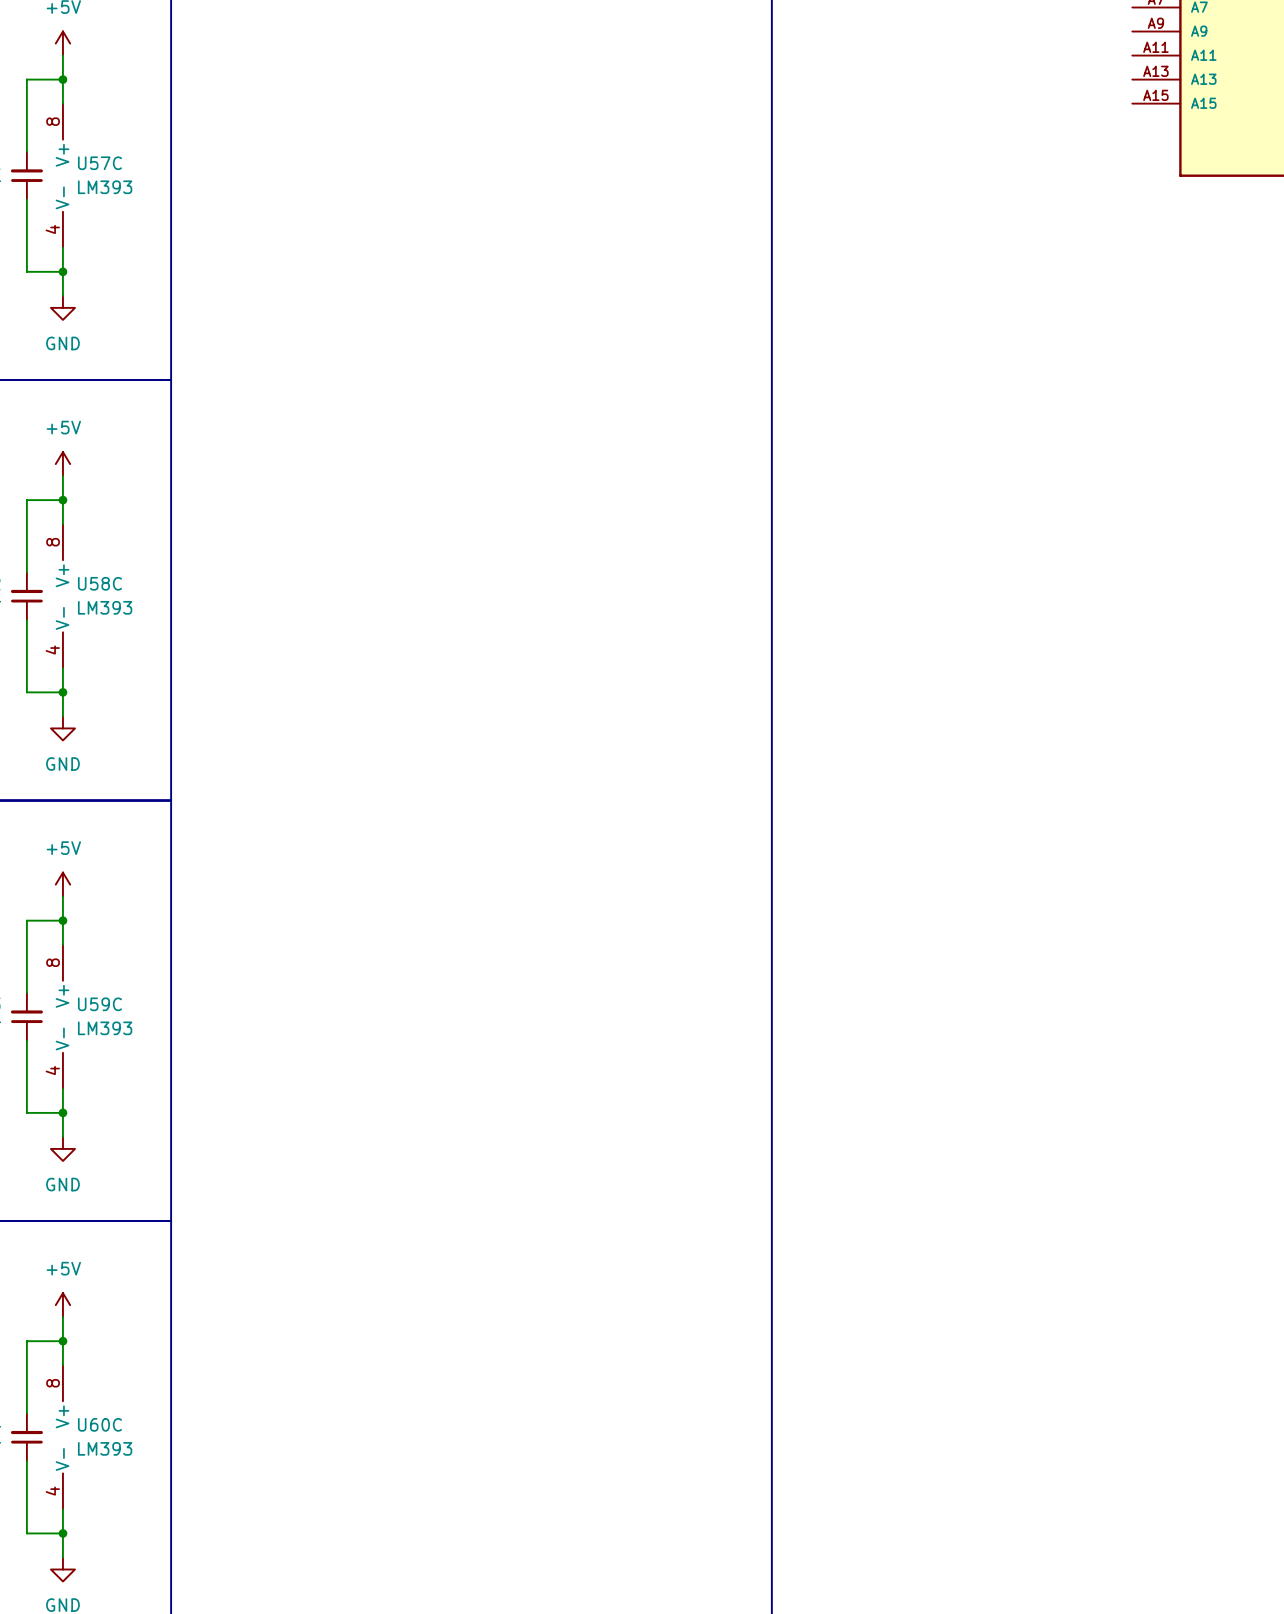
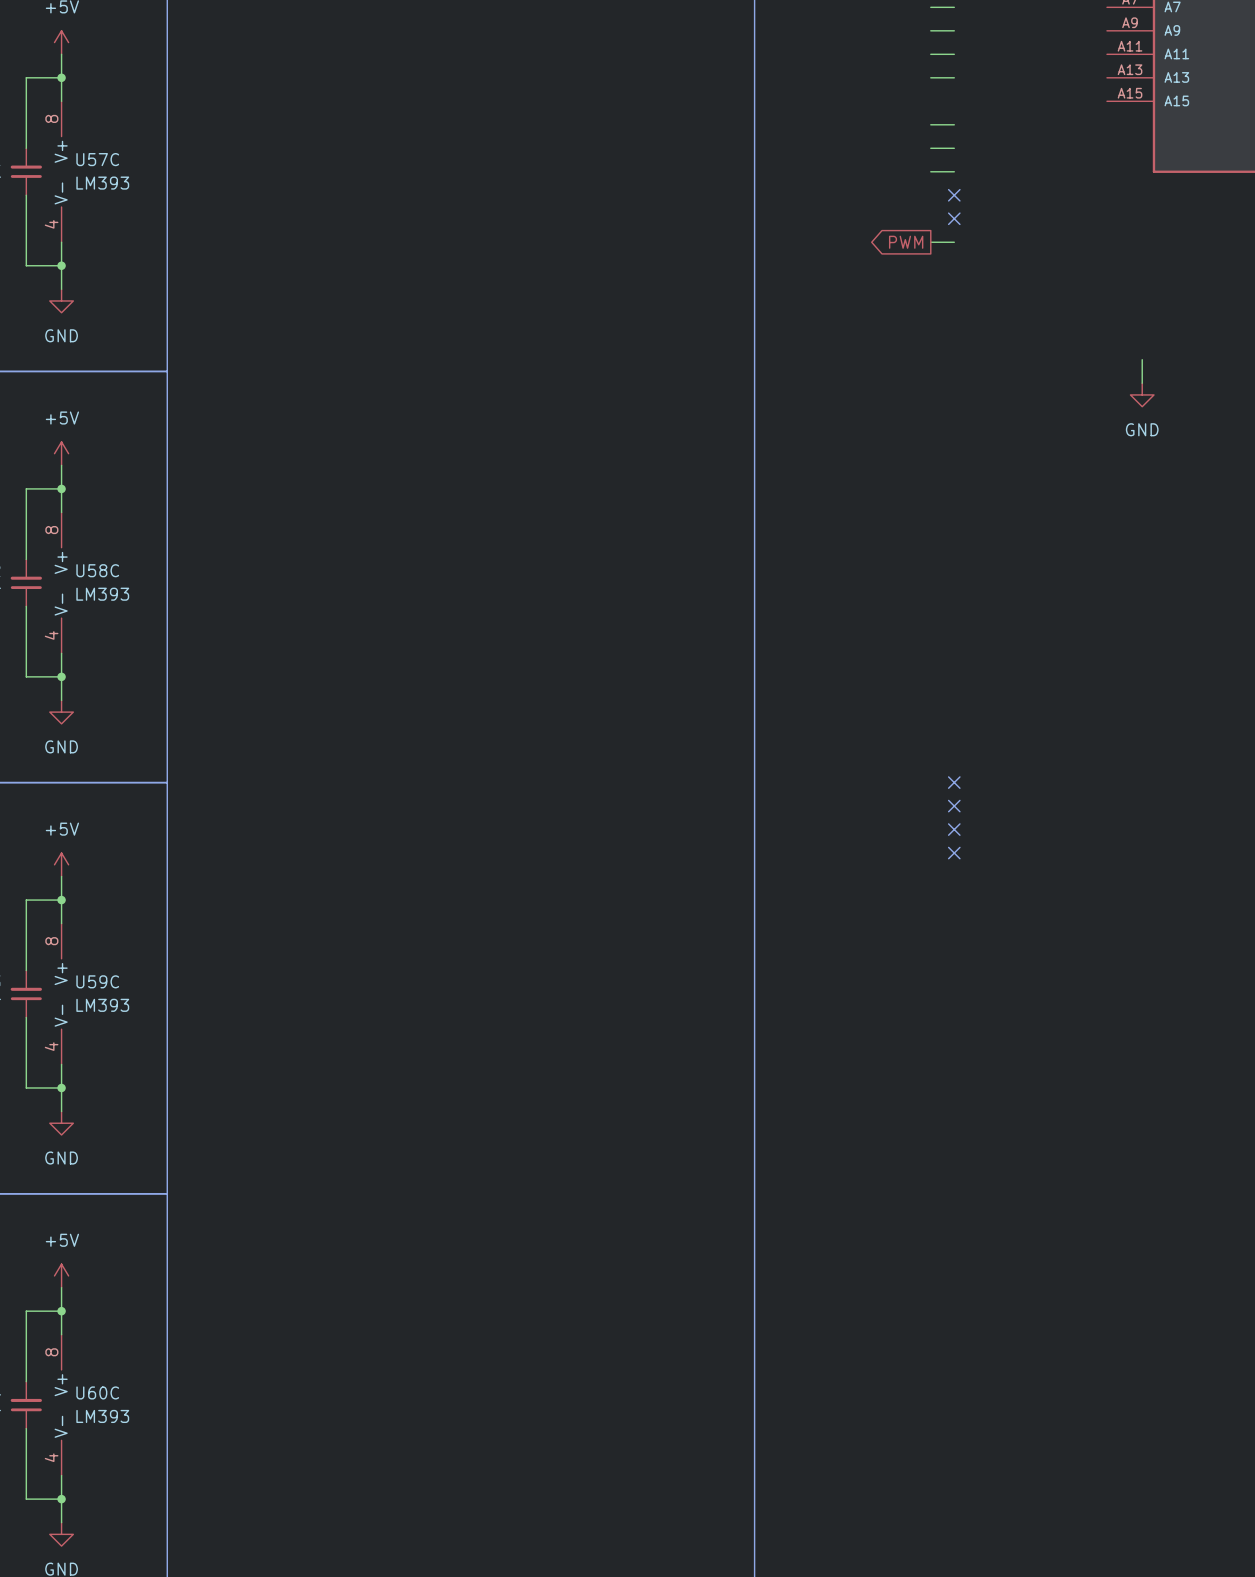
wire: none -> (930, 7) (954, 7)
wire: none -> (930, 30) (954, 30)
wire: none -> (930, 54) (954, 54)
wire: none -> (930, 77) (954, 77)
wire: none -> (930, 124) (954, 124)
wire: none -> (930, 148) (954, 148)
wire: none -> (930, 171) (954, 171)
no-connect mark: none -> (954, 195)
no-connect mark: none -> (954, 218)
global label: none -> PWM (906, 242)
wire: none -> (930, 242) (954, 242)
wire: none -> (1142, 359) (1142, 383)
power symbol: none -> GND (1142, 394)
no-connect mark: none -> (954, 782)
no-connect mark: none -> (954, 806)
no-connect mark: none -> (954, 829)
no-connect mark: none -> (954, 853)

